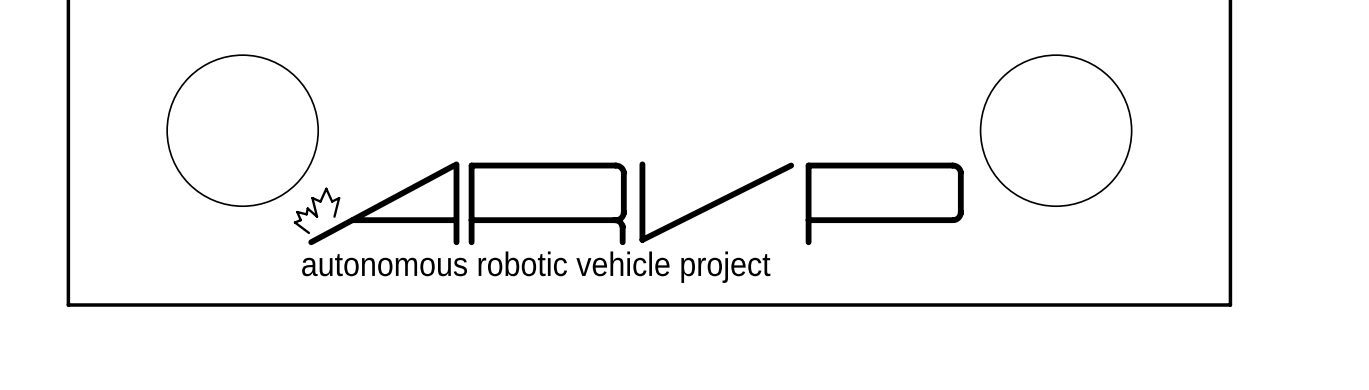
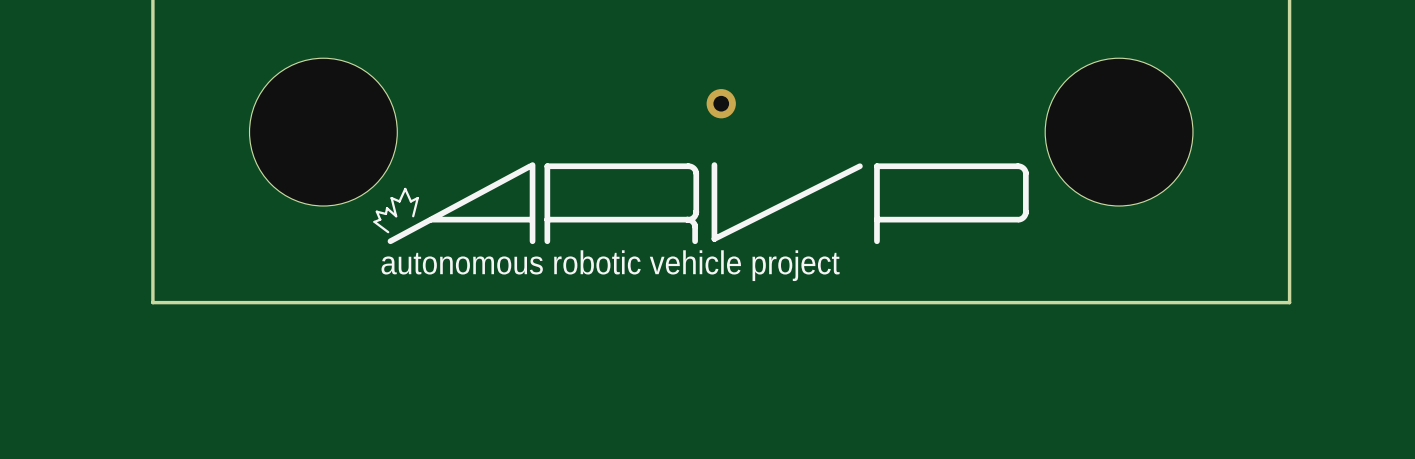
via: none -> (721, 103)

